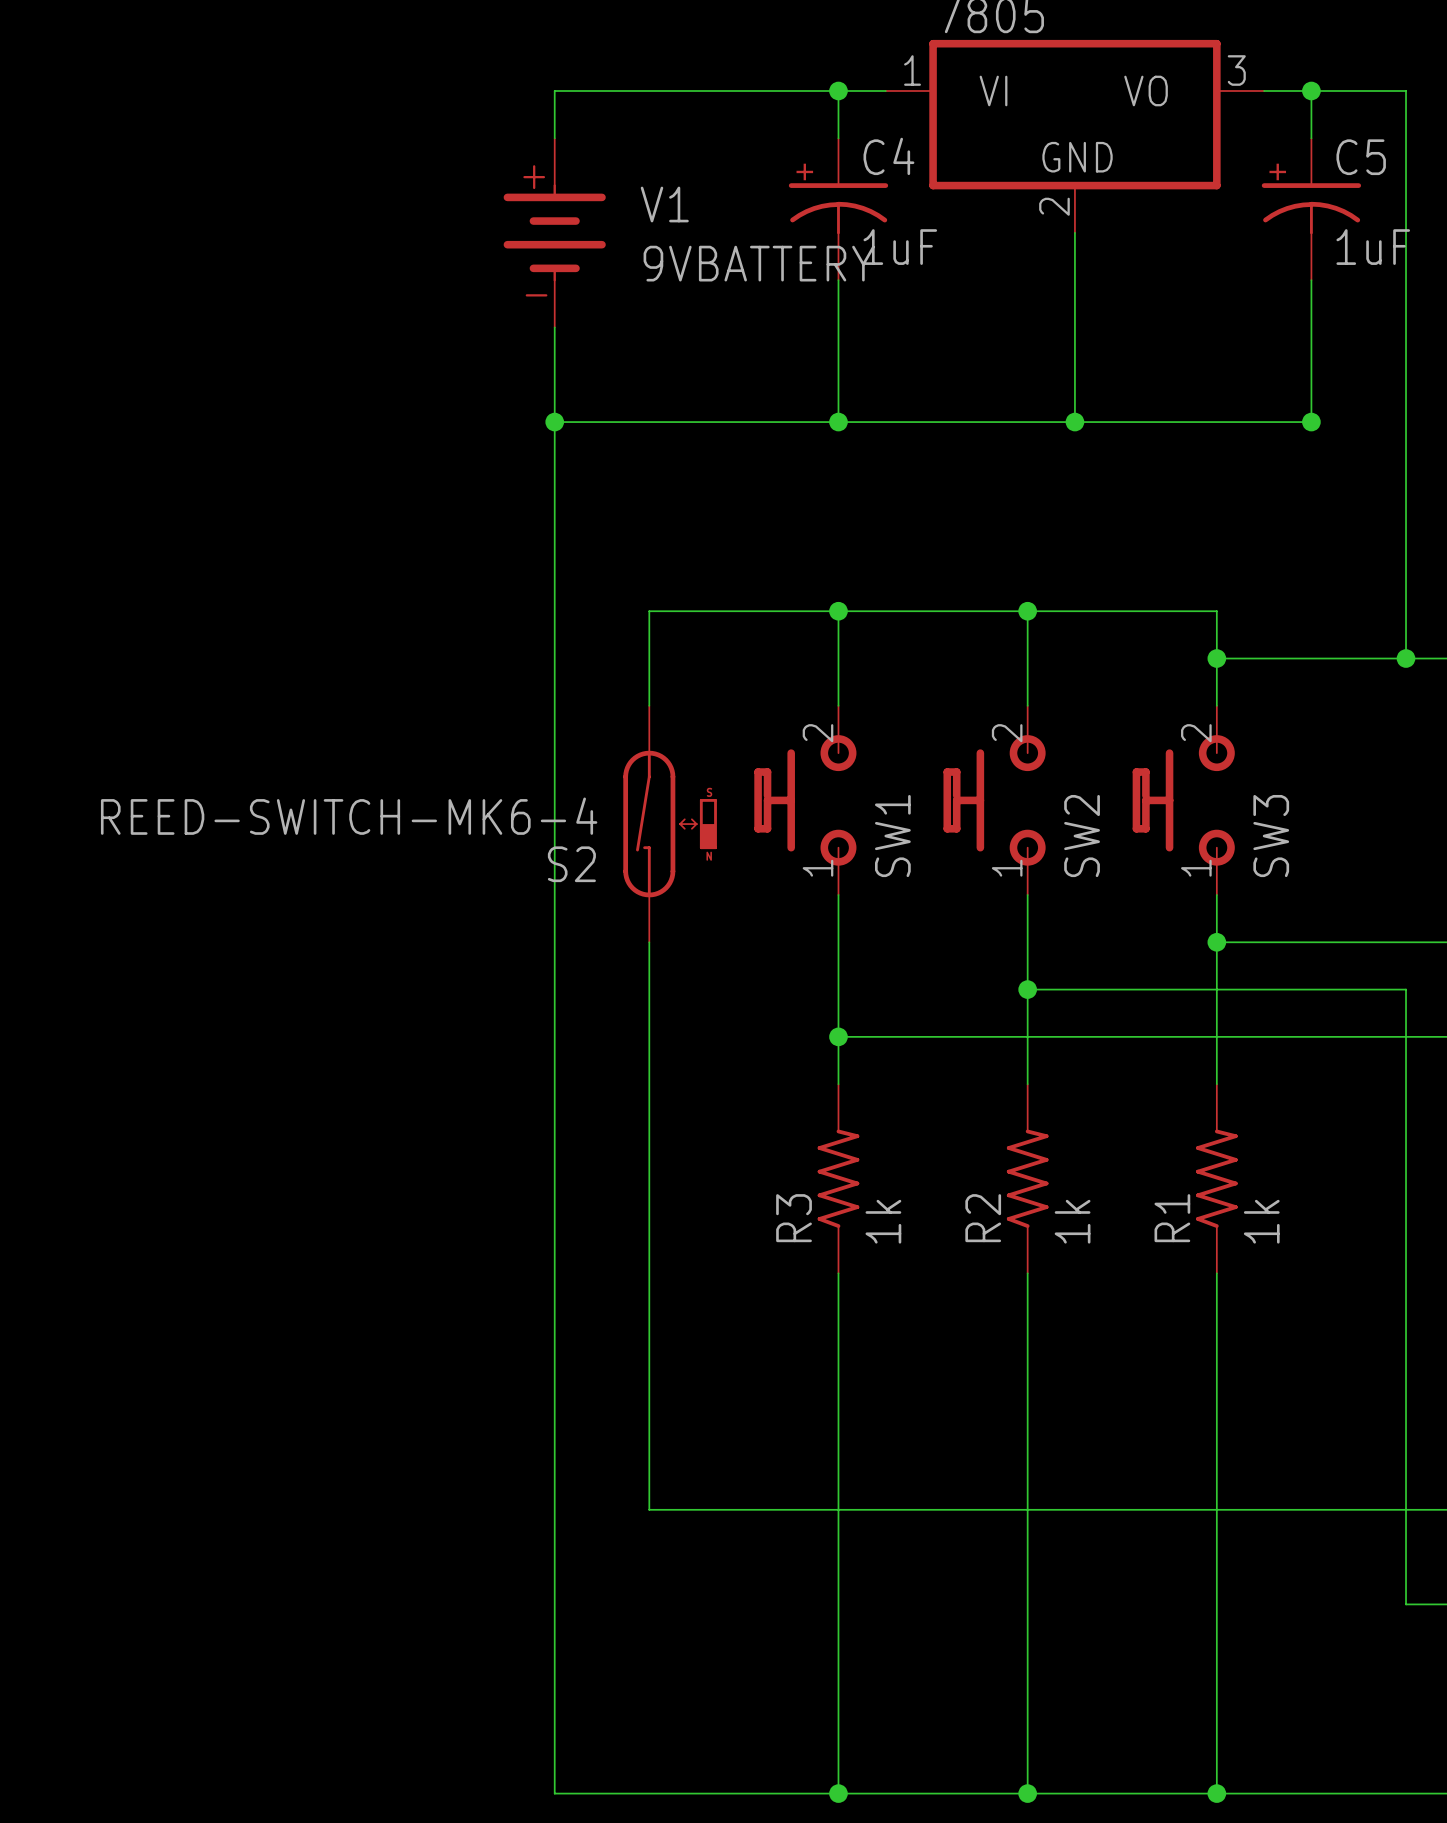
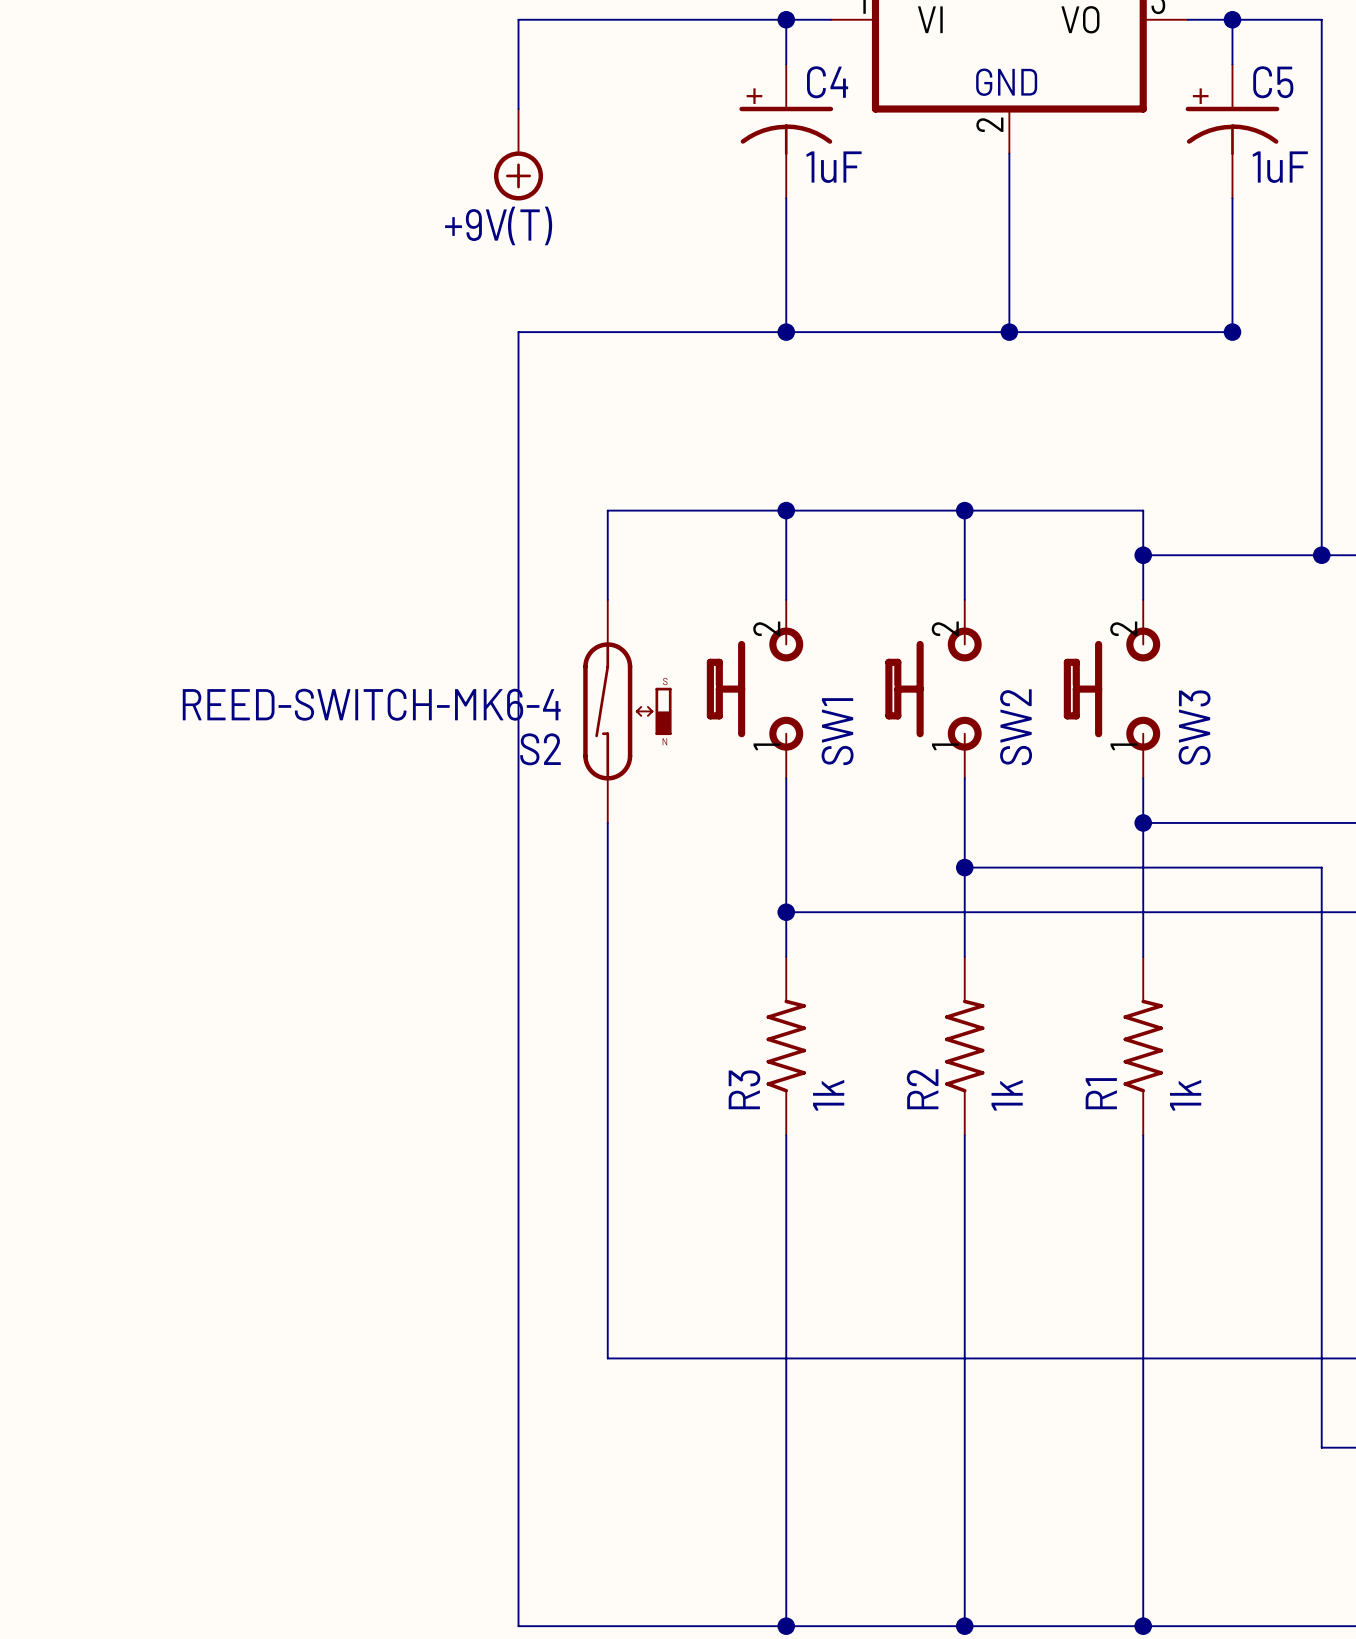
V1: 9VBATTERY (554, 232) -> none
part: none -> +9V(T) (518, 154)
wire: (554, 327) (554, 422) -> none
junction: (554, 422) -> none

